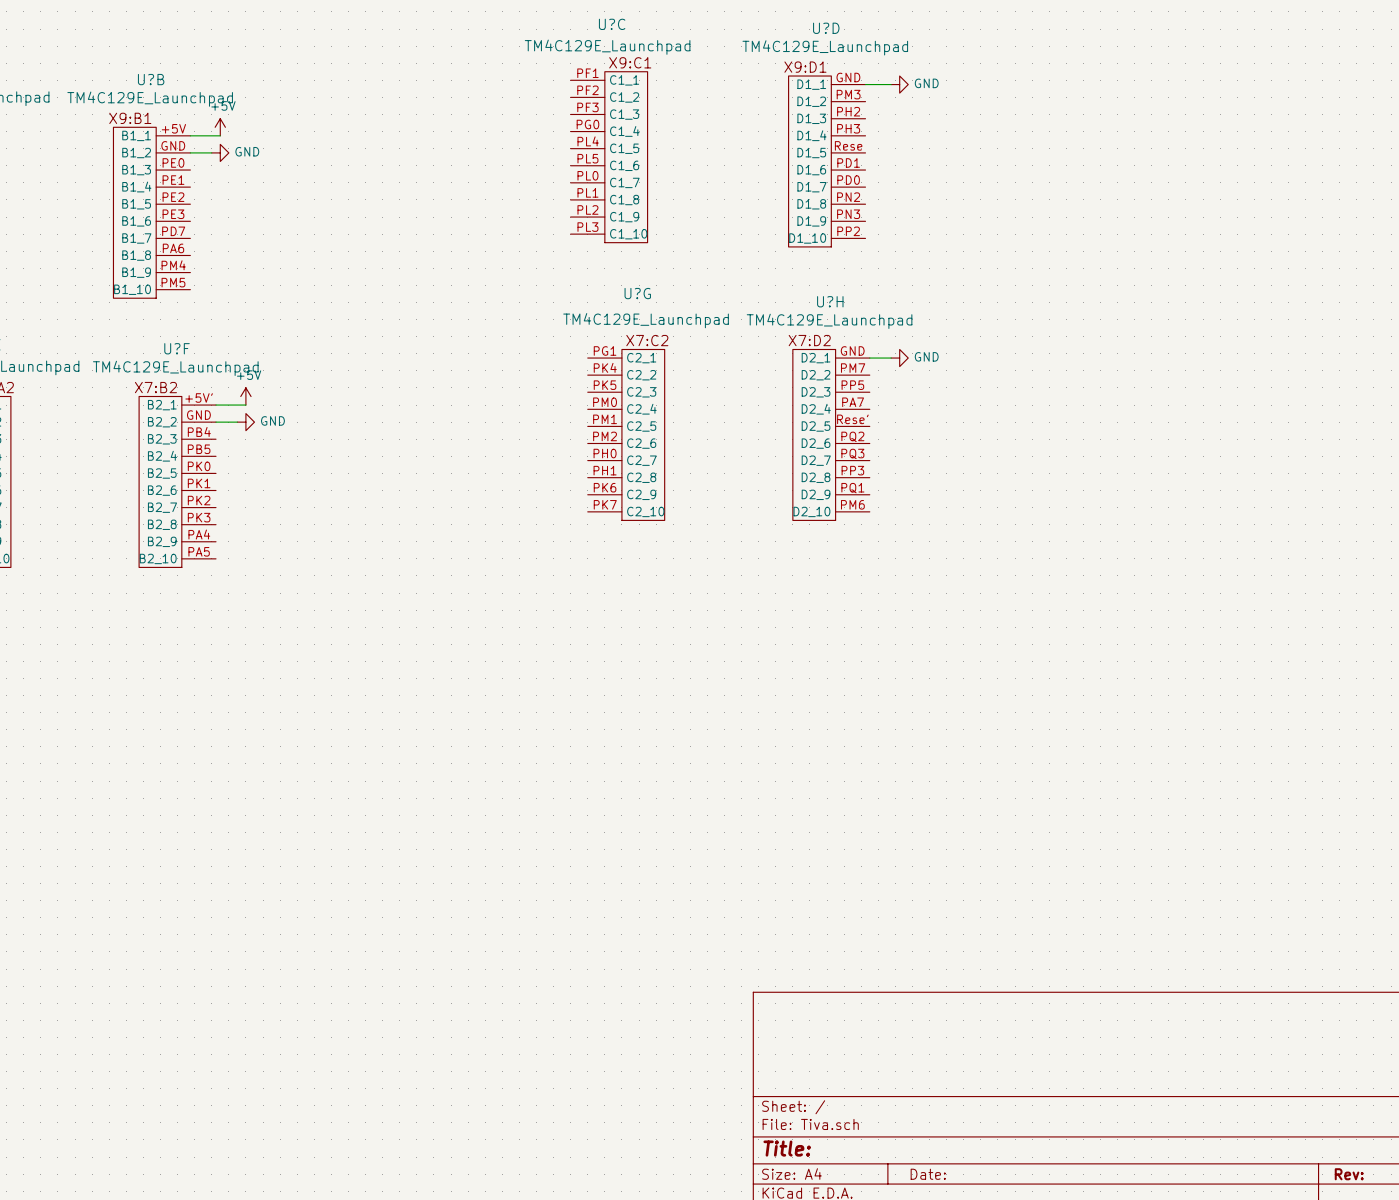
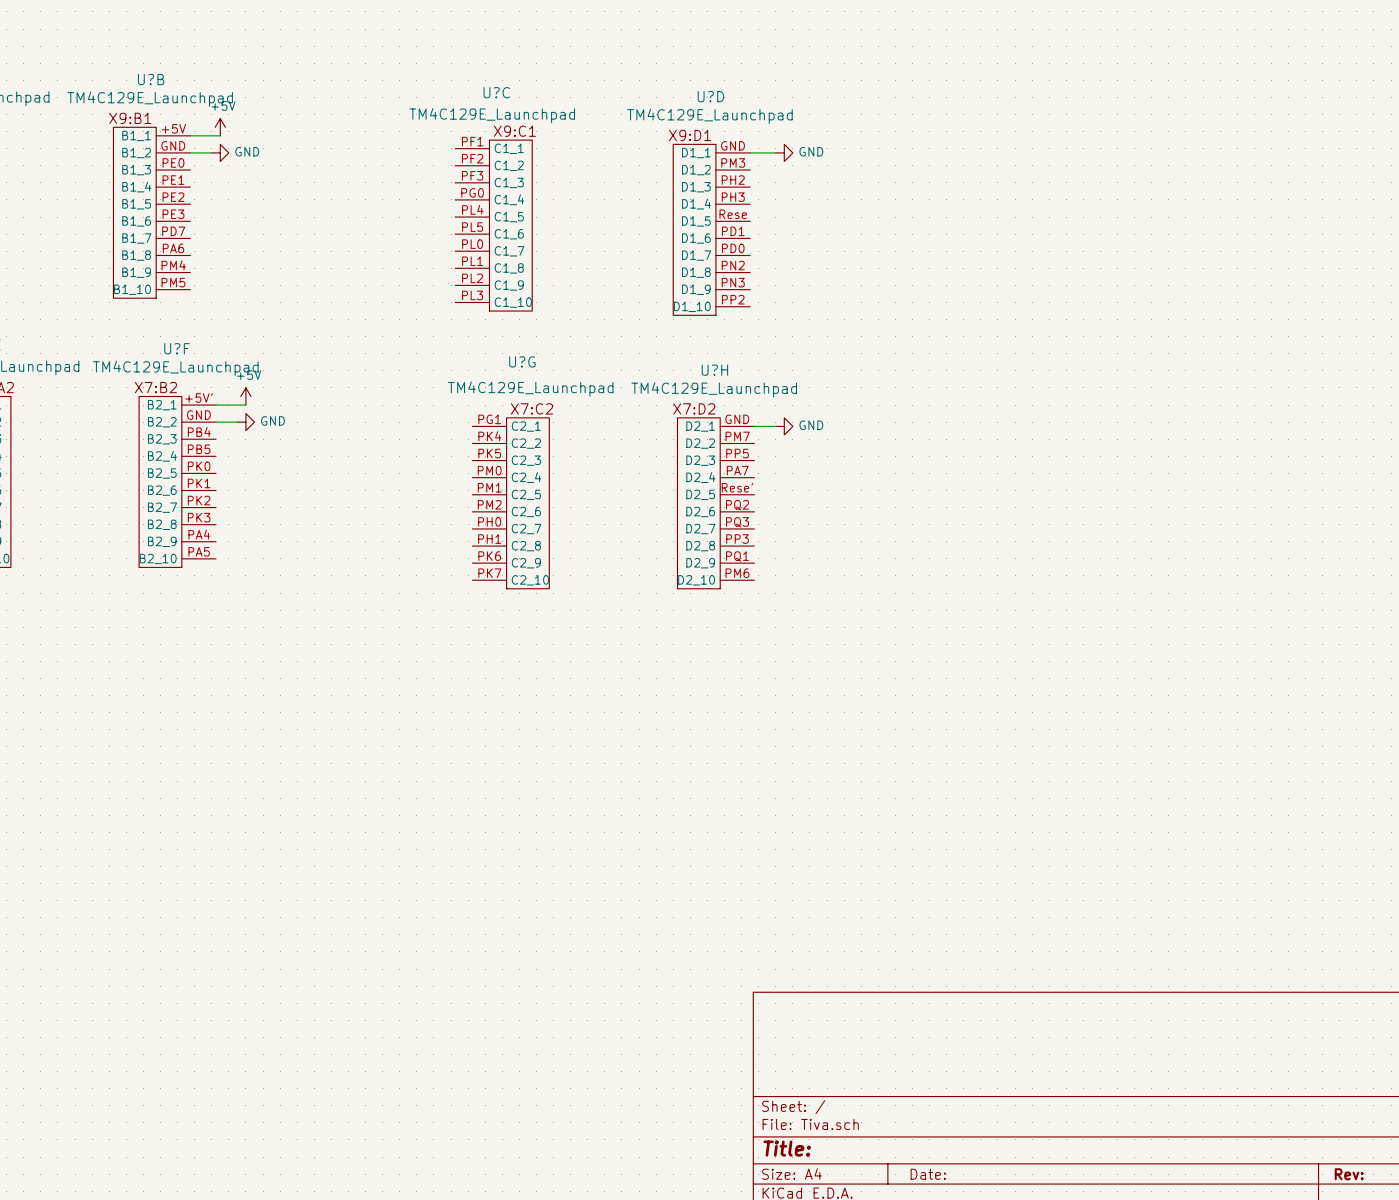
wire: (865, 84) (891, 84) -> (750, 152) (775, 152)
power symbol: GND (899, 84) -> none
power symbol: none -> GND (784, 152)
U?C position: (609, 157) -> (493, 225)
U?D position: (827, 161) -> (711, 229)
wire: (869, 358) (891, 358) -> (754, 426) (775, 426)
power symbol: GND (899, 358) -> none
power symbol: none -> GND (784, 426)
U?G position: (626, 434) -> (510, 503)
U?H position: (831, 434) -> (715, 503)

